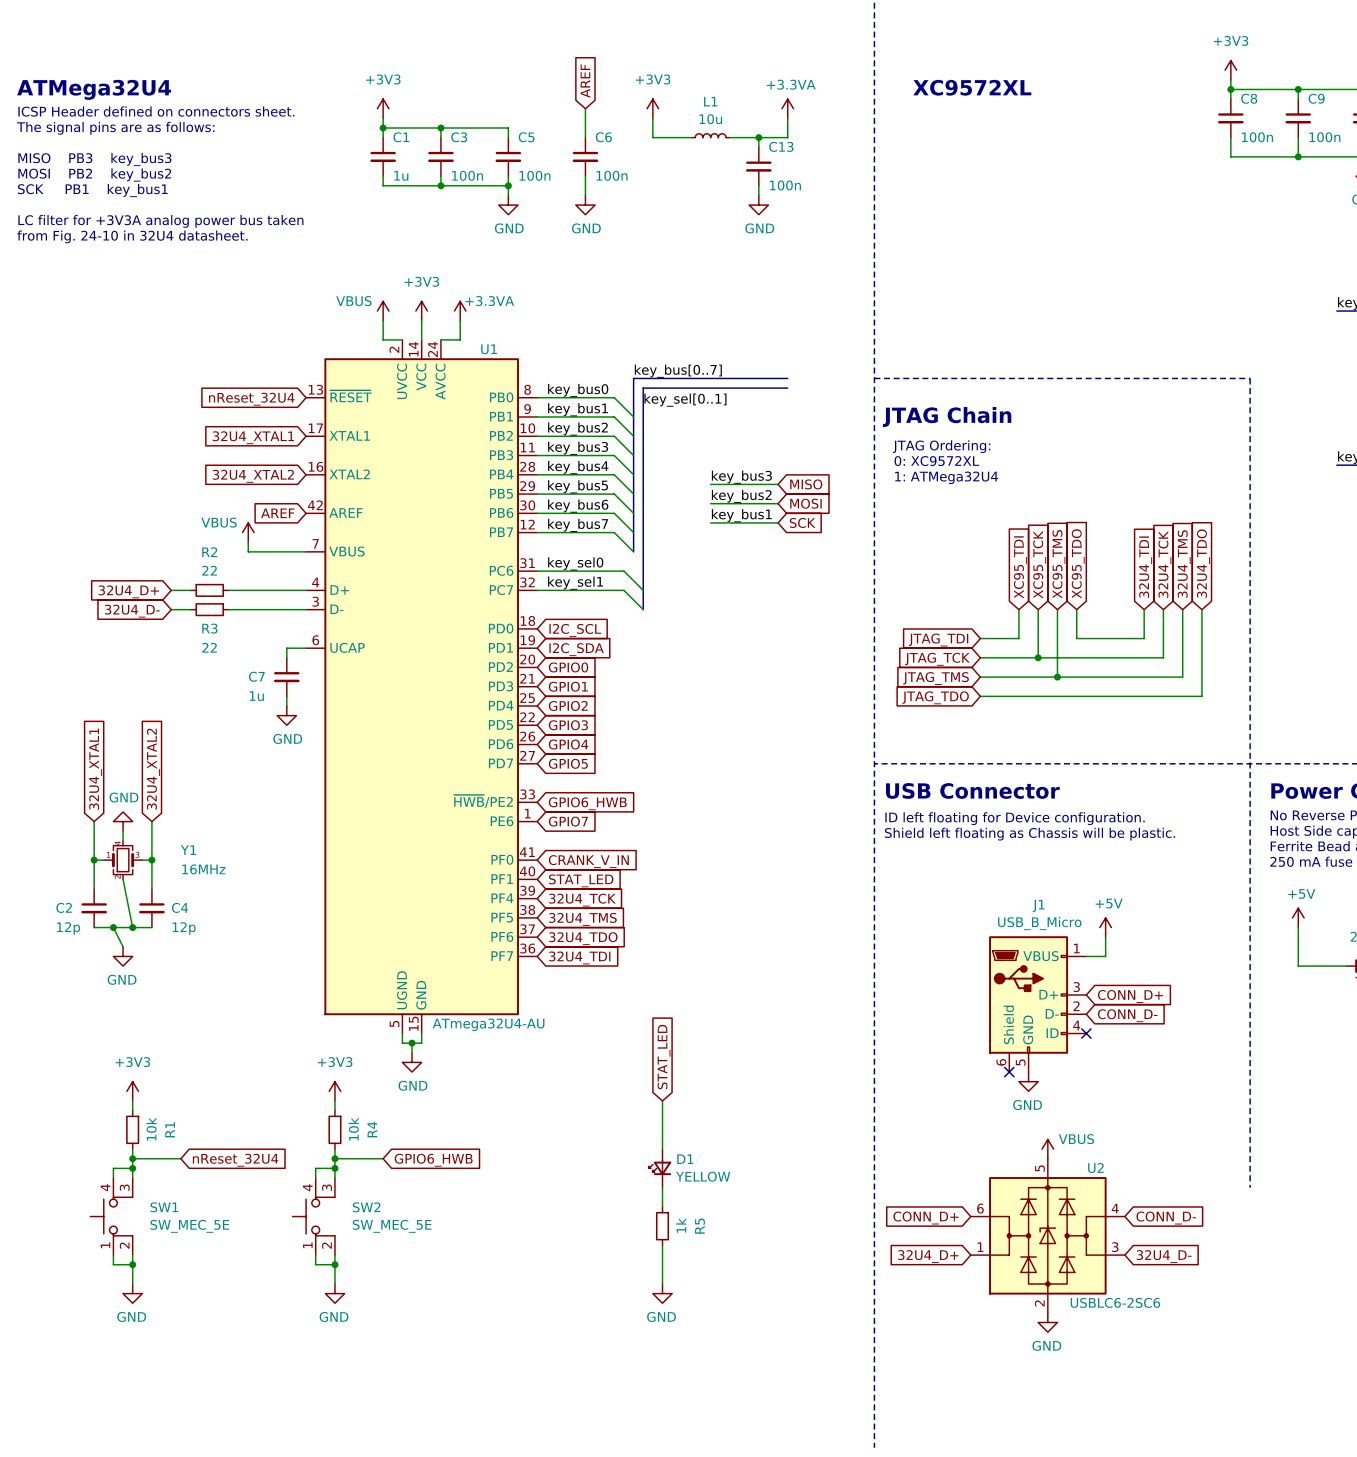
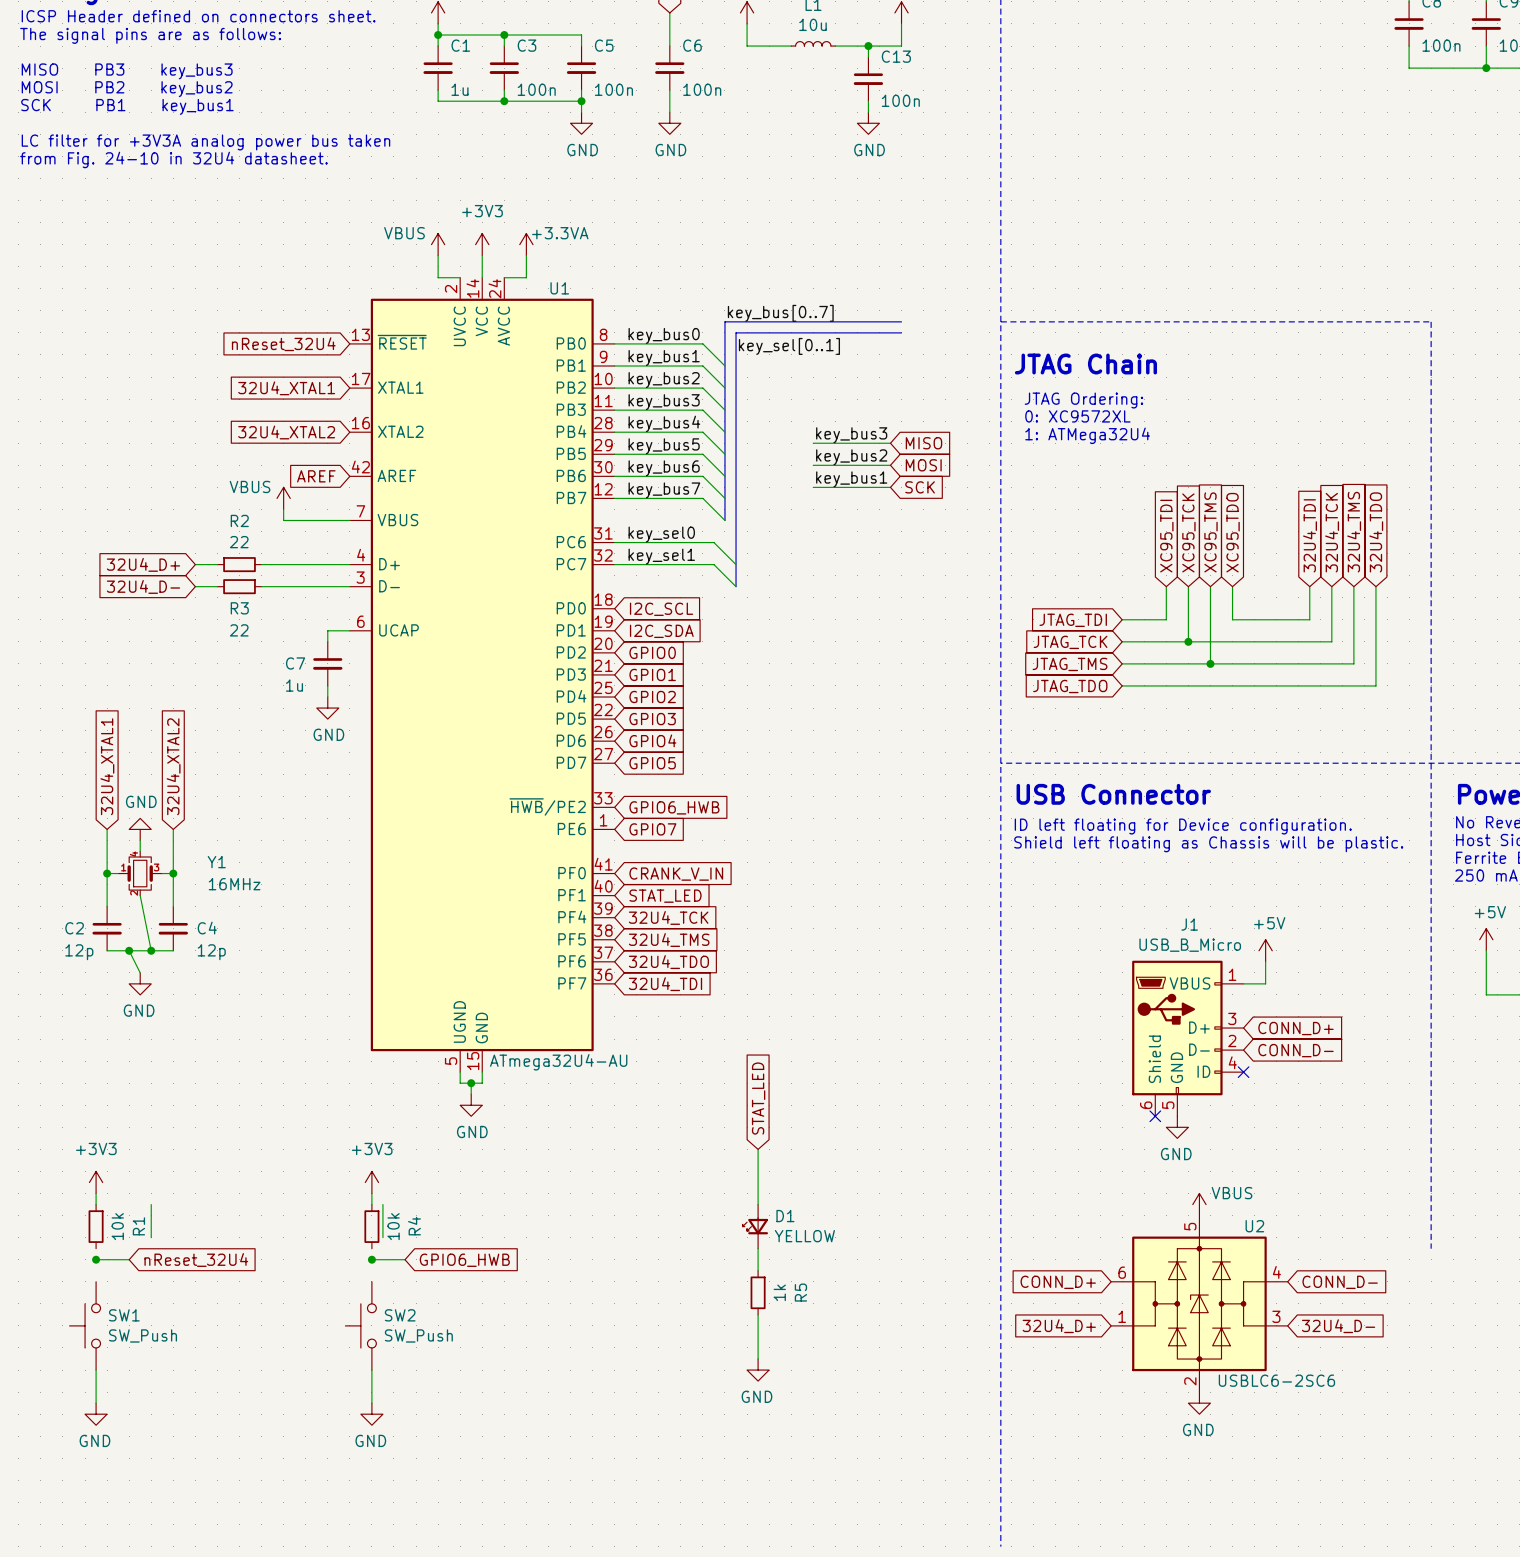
power symbol position: +3V3 (132, 1091) -> +3V3 (96, 1182)
power symbol position: +3V3 (334, 1091) -> +3V3 (371, 1182)
wire: (132, 1100) (132, 1110) -> (96, 1193) (96, 1204)
wire: (334, 1100) (334, 1110) -> (371, 1193) (371, 1204)
R1 position: (132, 1129) -> (96, 1226)
R4 position: (334, 1129) -> (371, 1226)
wire: (132, 1158) (180, 1158) -> none
junction: (132, 1158) -> none
wire: (334, 1158) (383, 1158) -> none
junction: (334, 1158) -> none
global label position: nReset_32U4 (235, 1160) -> nReset_32U4 (196, 1259)
global label position: GPIO6_HWB (433, 1160) -> GPIO6_HWB (464, 1260)
wire: (132, 1168) (113, 1168) (113, 1178) -> none
junction: (132, 1168) -> none
wire: (334, 1168) (315, 1168) (315, 1178) -> none
junction: (334, 1168) -> none
SW1 symbol: [90, 1178, 133, 1256] -> [69, 1281, 101, 1371]
SW2 symbol: [292, 1178, 335, 1256] -> [345, 1281, 377, 1371]
wire: none -> (96, 1259) (129, 1259)
junction: none -> (96, 1259)
wire: none -> (371, 1259) (405, 1259)
junction: none -> (371, 1259)
SW1 name position: SW1 (164, 1207) -> SW1 (124, 1315)
SW2 name position: SW2 (366, 1207) -> SW2 (400, 1315)
SW1 value: SW_MEC_5E (189, 1226) -> SW_Push (143, 1335)
SW2 value: SW_MEC_5E (392, 1226) -> SW_Push (418, 1335)
wire: (113, 1255) (113, 1264) (132, 1264) -> none
wire: (132, 1255) (132, 1283) -> (96, 1370) (96, 1403)
wire: (315, 1255) (315, 1264) (334, 1264) -> none
wire: (334, 1255) (334, 1283) -> (371, 1370) (371, 1403)
junction: (132, 1264) -> none
junction: (334, 1264) -> none
power symbol position: GND (132, 1293) -> GND (96, 1414)
power symbol position: GND (334, 1293) -> GND (371, 1414)

